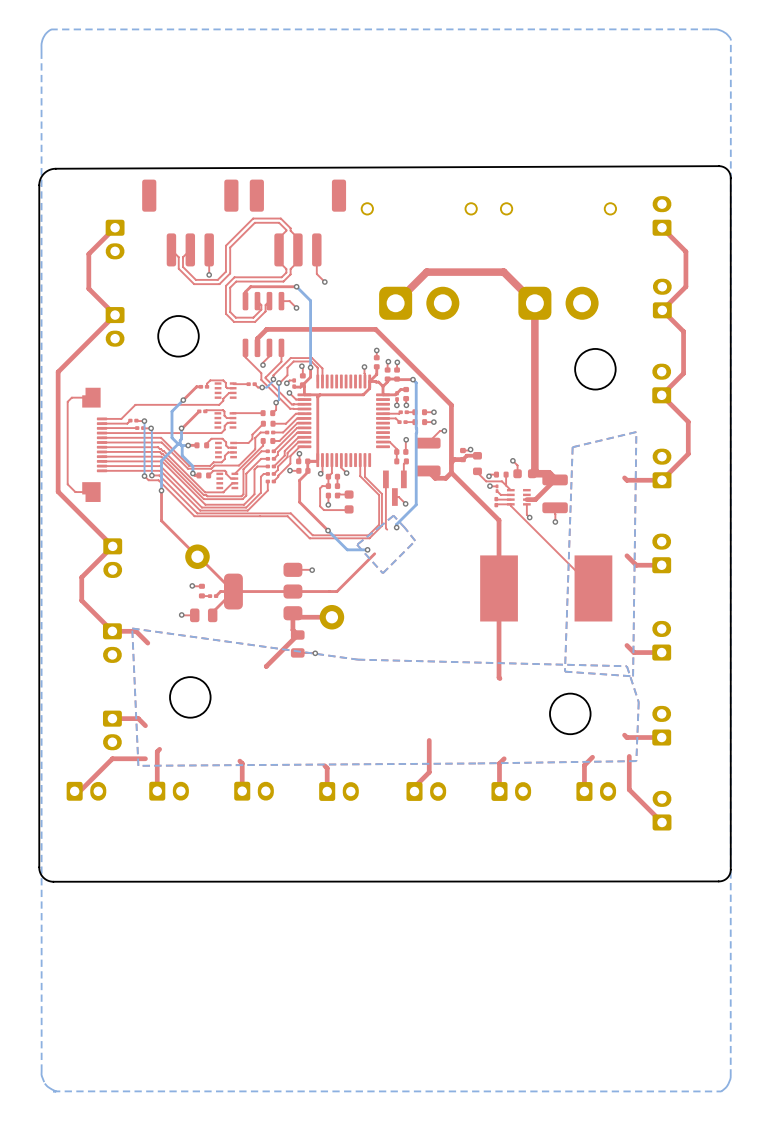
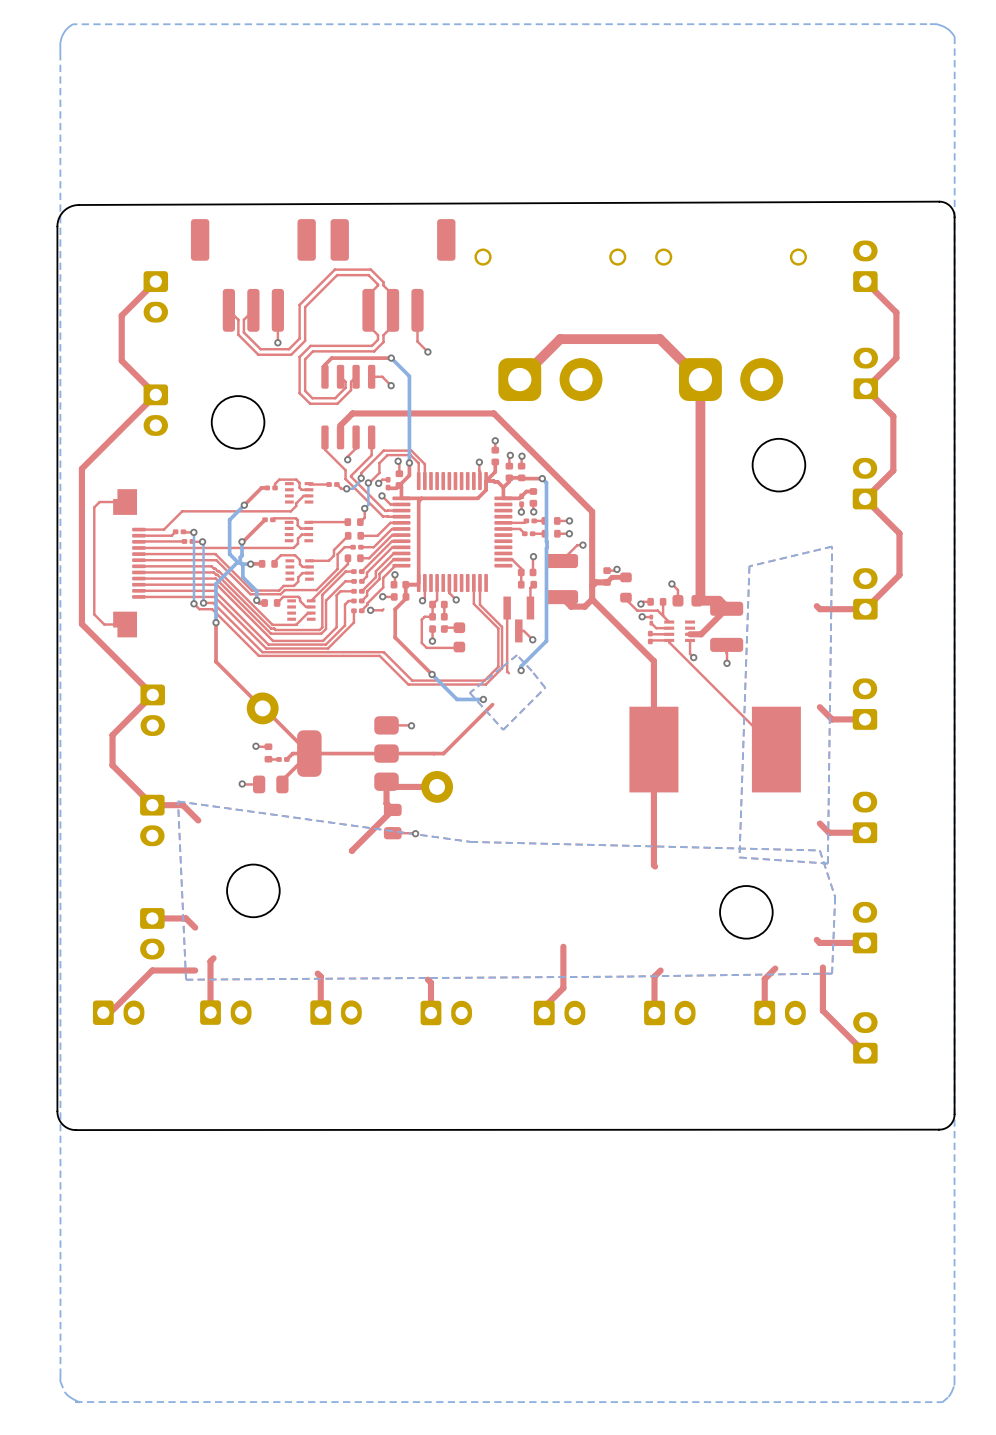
top track: none -> (383, 609) (370, 610)
via: none -> (370, 610)

